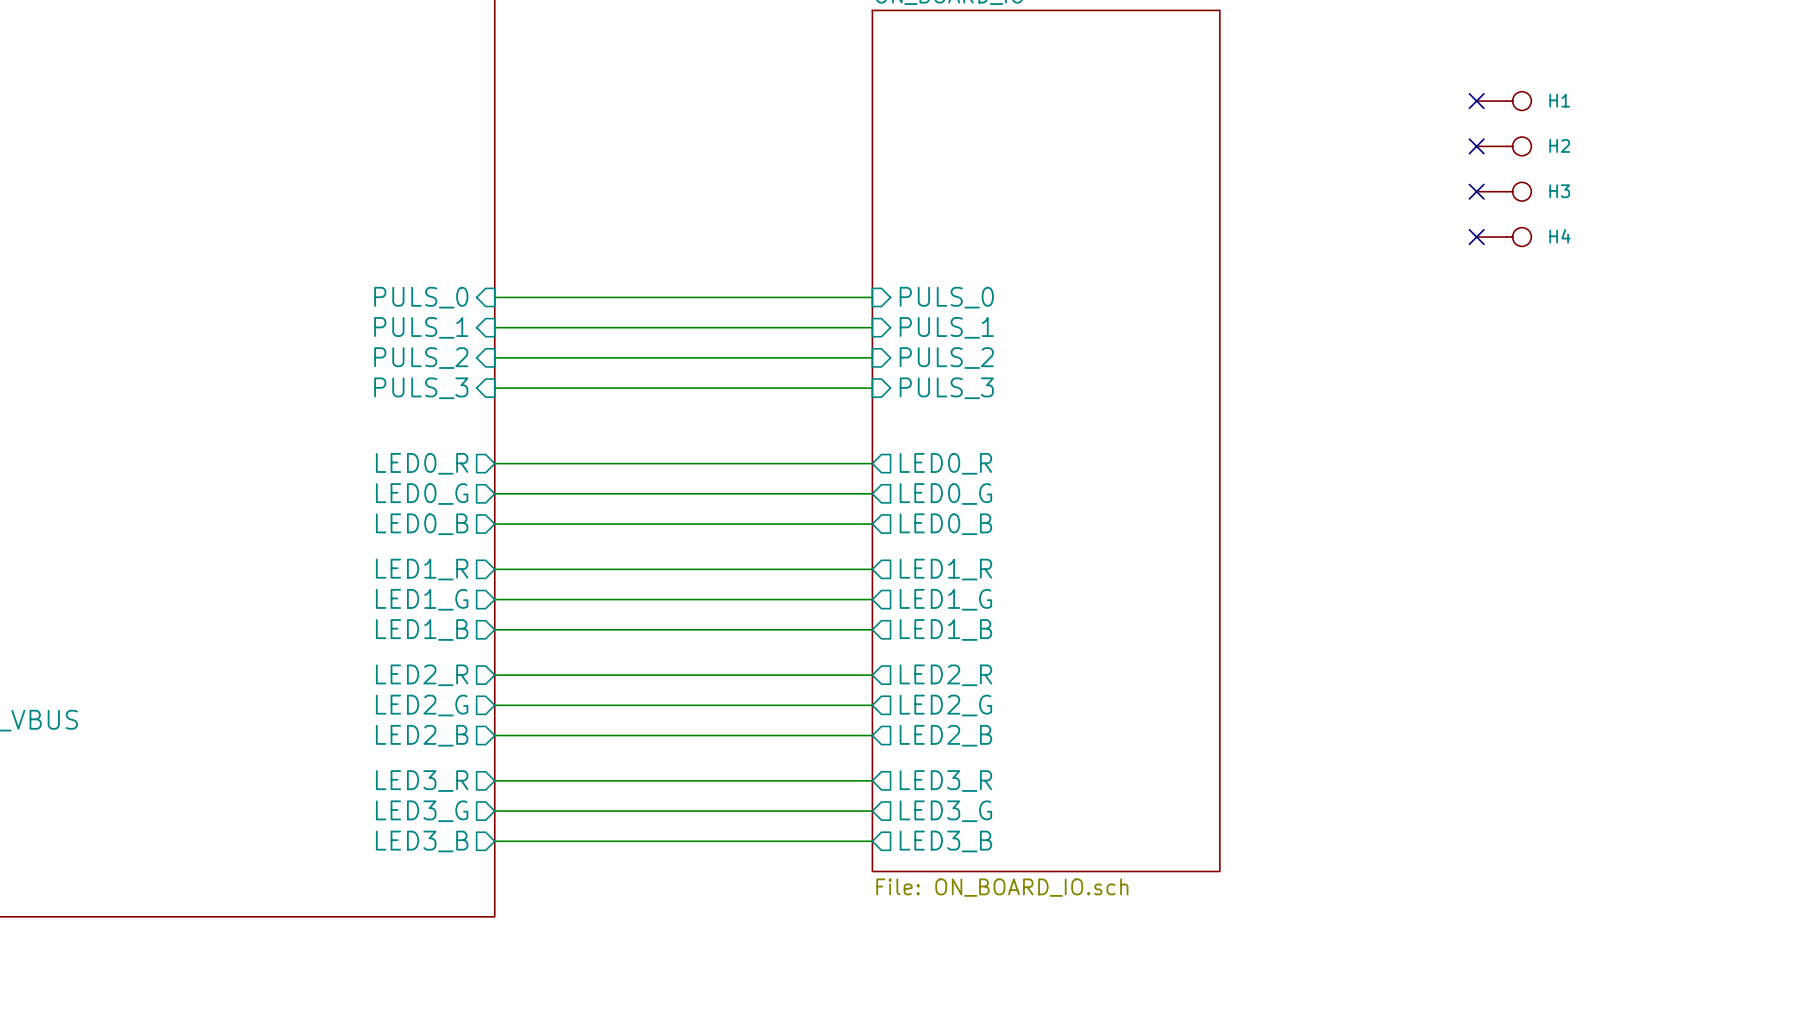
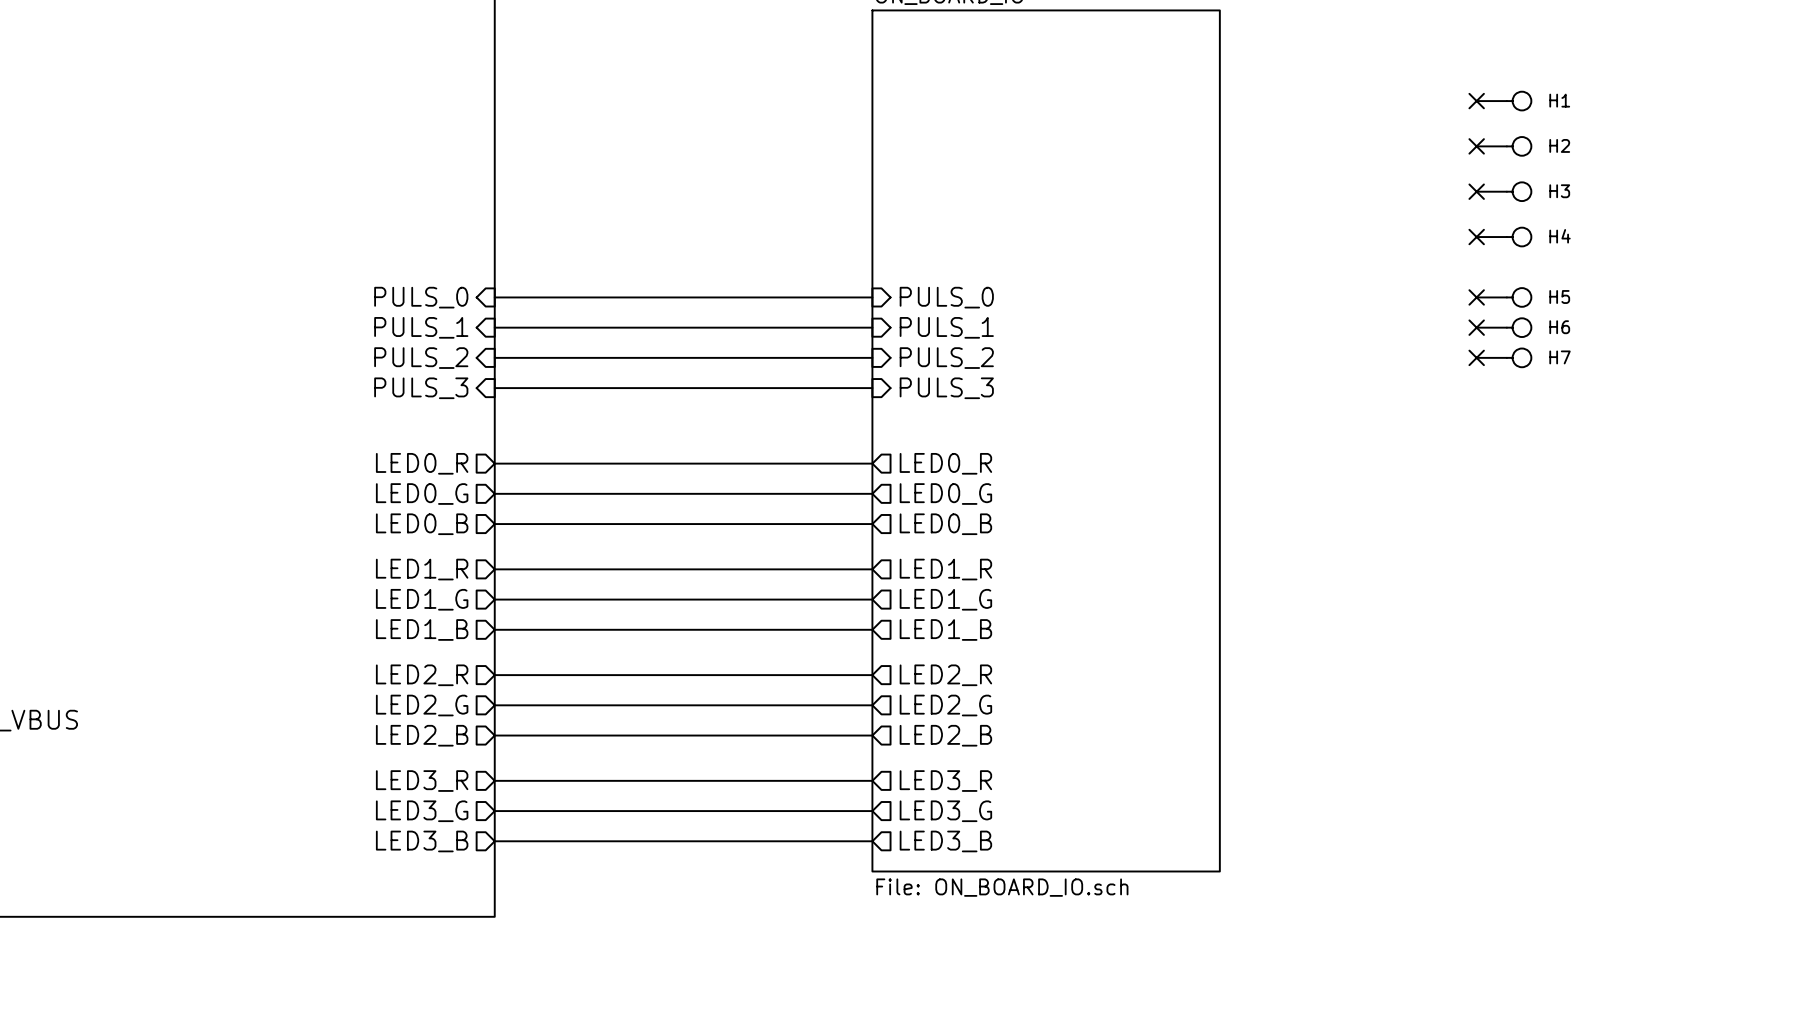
no-connect mark: none -> (1476, 297)
H5: none -> (1504, 297)
no-connect mark: none -> (1476, 327)
H6: none -> (1504, 327)
no-connect mark: none -> (1476, 357)
H7: none -> (1504, 357)

